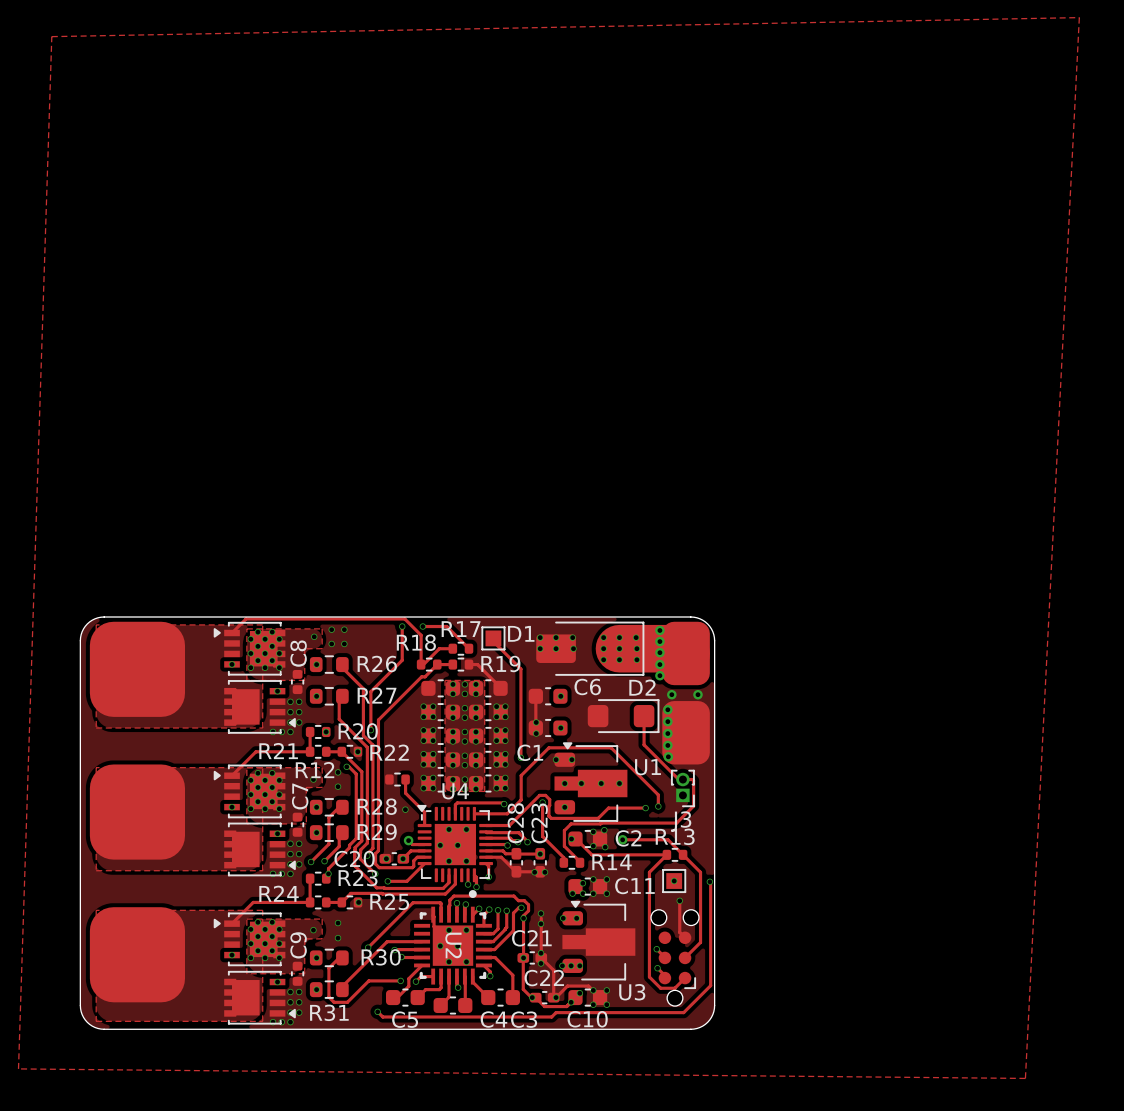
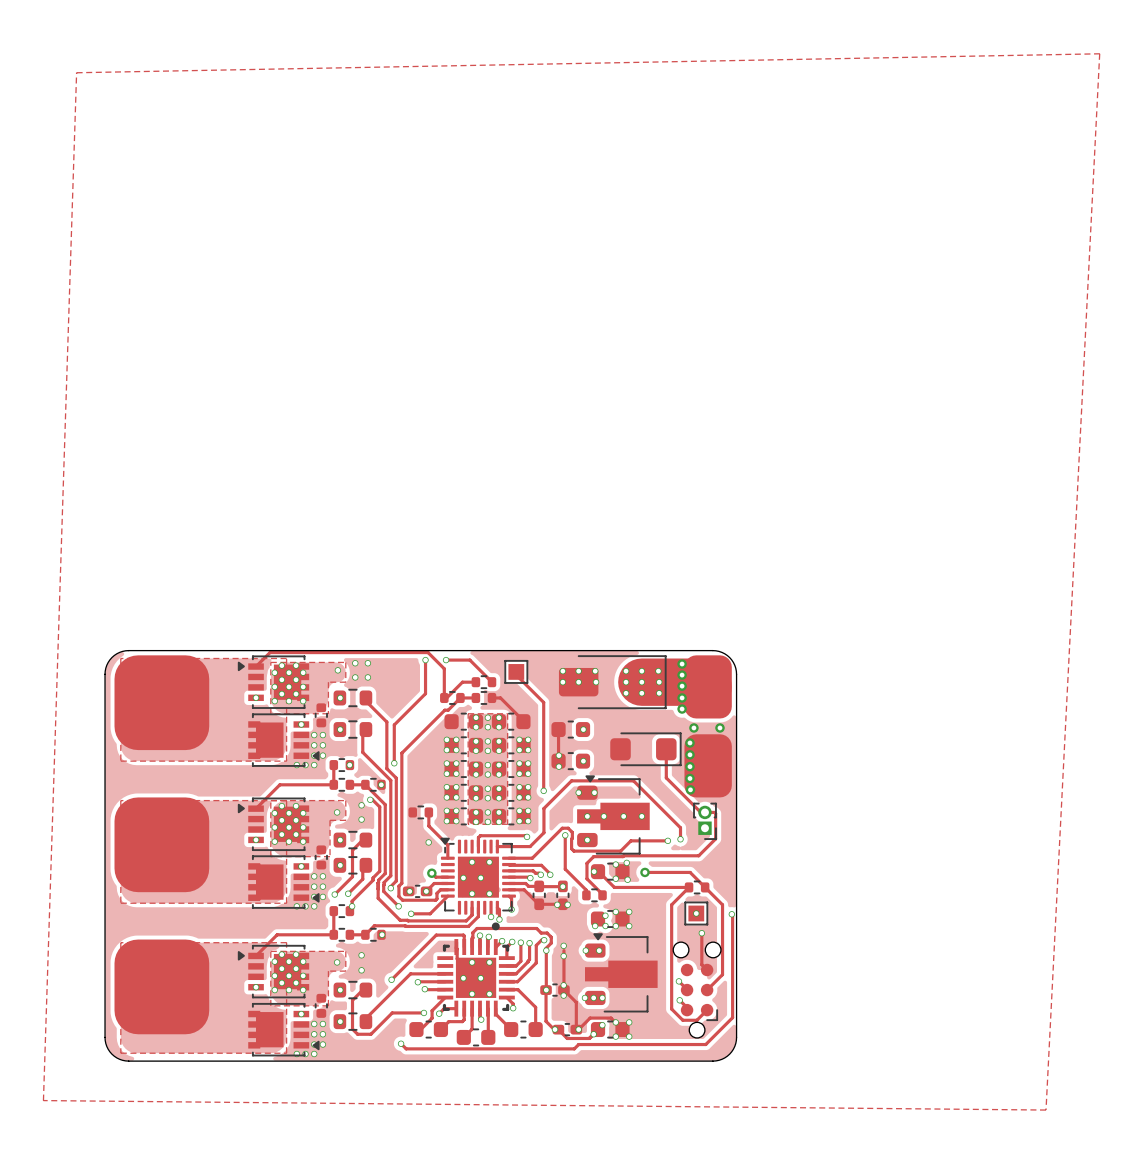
R17 name: R17 (461, 629) -> none
D1 name: D1 (521, 633) -> none
R18 name: R18 (416, 642) -> none
C8 name: C8 (298, 653) -> none
R26 name: R26 (377, 663) -> none
R19 name: R19 (500, 663) -> none
C6 name: C6 (587, 686) -> none
D2 name: D2 (642, 687) -> none
R27 name: R27 (377, 695) -> none
R20 name: R20 (358, 731) -> none
R21 name: R21 (278, 751) -> none
R22 name: R22 (389, 752) -> none
C1 name: C1 (530, 752) -> none
U1 name: U1 (647, 767) -> none
R12 name: R12 (315, 770) -> none
U4 name: U4 (455, 791) -> none
C7 name: C7 (300, 796) -> none
R28 name: R28 (377, 806) -> none
J3 name: J3 (681, 821) -> none
C28 name: C28 (515, 823) -> none
C23 name: C23 (539, 823) -> none
R29 name: R29 (377, 832) -> none
R13 name: R13 (675, 836) -> none
C2 name: C2 (628, 838) -> none
C20 name: C20 (354, 859) -> none
R14 name: R14 (612, 862) -> none
R23 name: R23 (358, 878) -> none
C11 name: C11 (634, 885) -> none
R24 name: R24 (279, 893) -> none
R25 name: R25 (389, 901) -> none
C21 name: C21 (531, 938) -> none
C9 name: C9 (298, 945) -> none
U2 name: U2 (453, 945) -> none
R30 name: R30 (381, 957) -> none
C22 name: C22 (544, 978) -> none
U3 name: U3 (632, 992) -> none
R31 name: R31 (329, 1012) -> none
C5 name: C5 (405, 1019) -> none
C4 name: C4 (493, 1019) -> none
C3 name: C3 (524, 1019) -> none
C10 name: C10 (587, 1019) -> none

